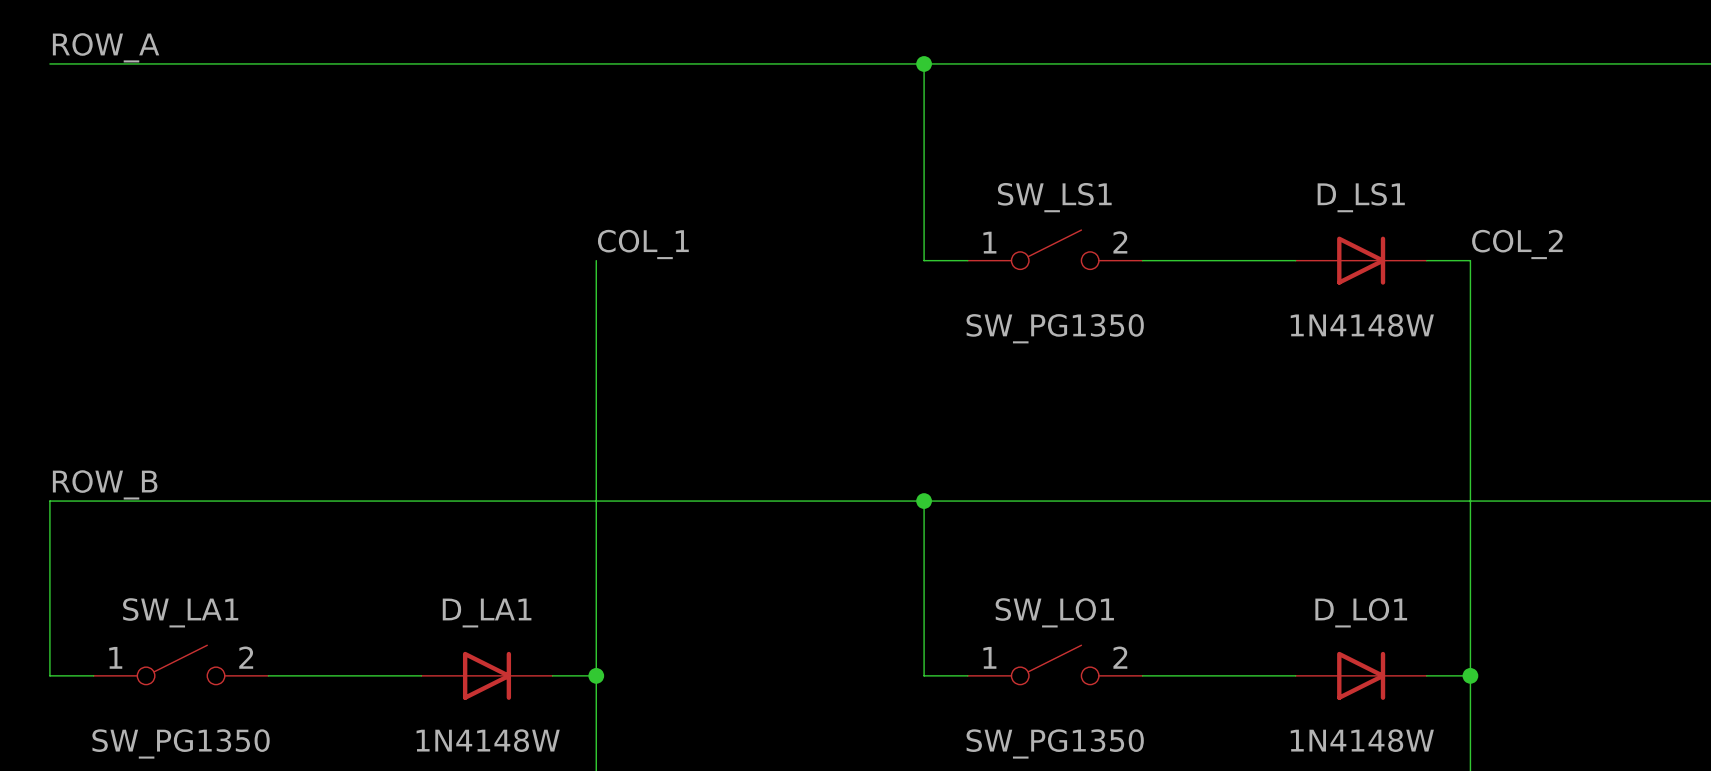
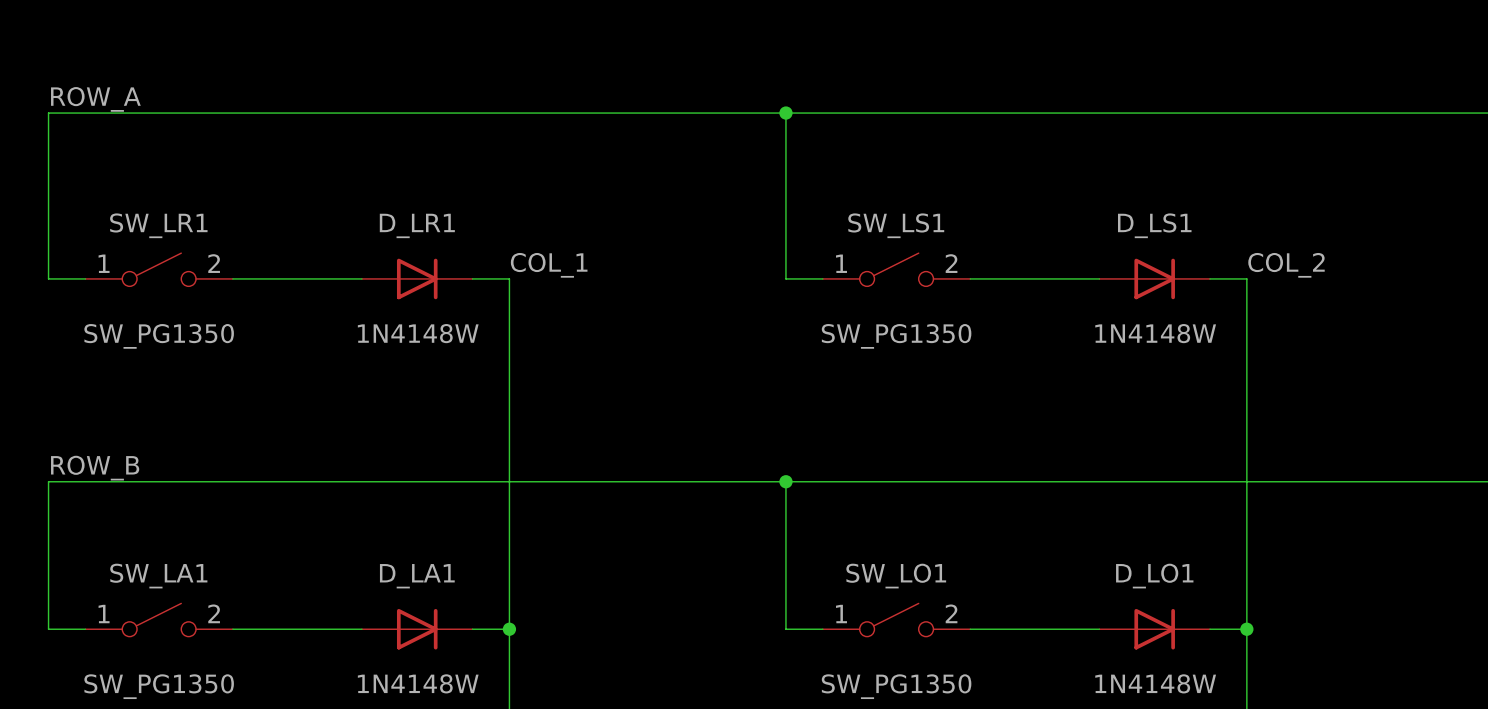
wire: none -> (48, 113) (48, 278) (85, 278)
SW_LR1: none -> SW_PG1350 (159, 269)
wire: none -> (232, 278) (361, 278)
D_LR1: none -> 1N4148W (417, 278)
wire: none -> (472, 278) (509, 278)

